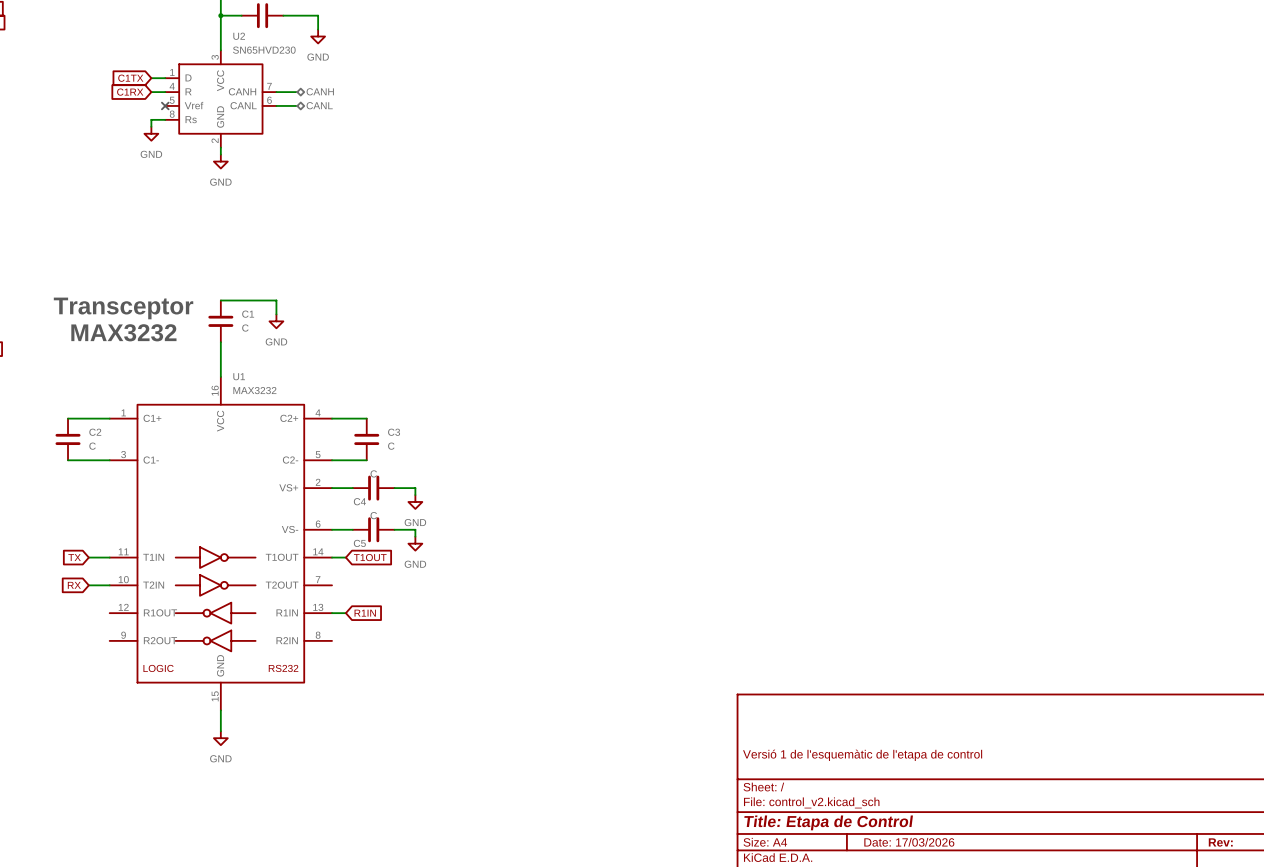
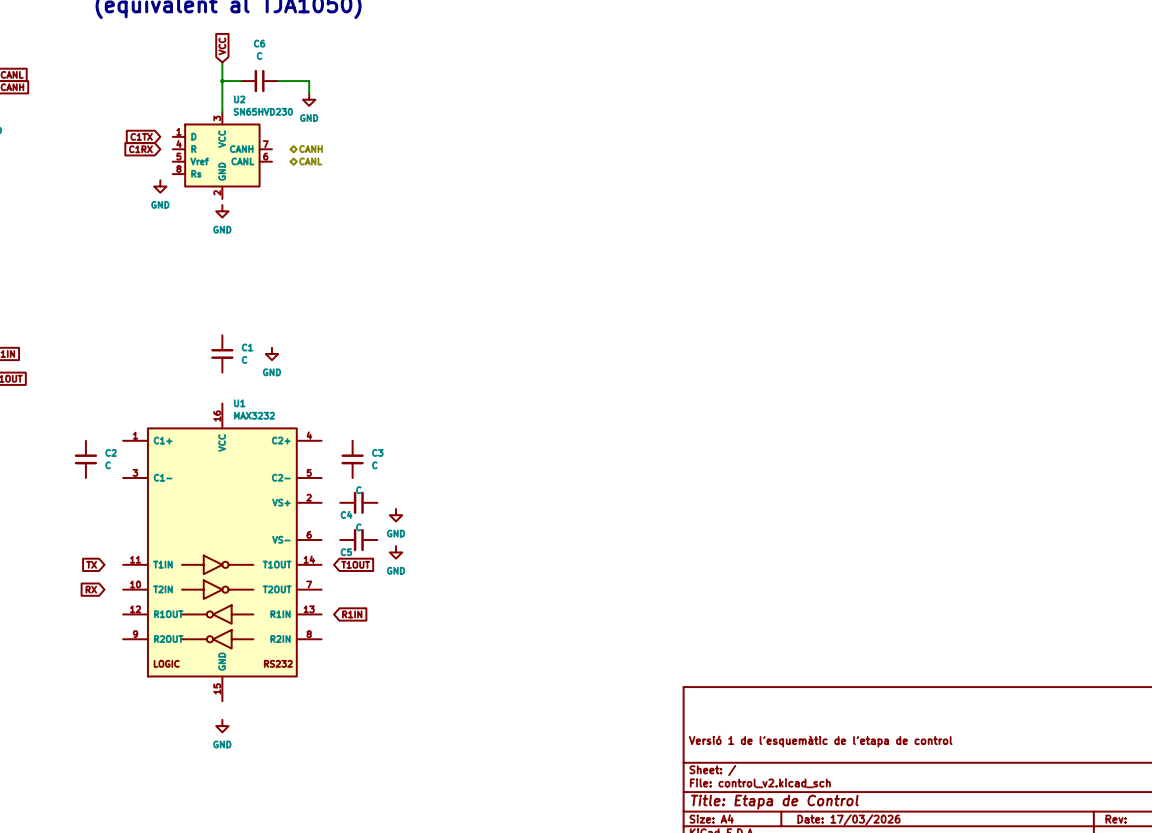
wire: (151, 78) (165, 78) -> none
wire: (151, 92) (165, 92) -> none
wire: (276, 92) (297, 92) -> none
no-connect mark: (165, 105) -> none
wire: (276, 105) (297, 105) -> none
wire: (165, 119) (151, 119) (151, 126) -> none
wire: (220, 147) (220, 154) -> none
wire: (220, 300) (276, 300) (276, 314) -> none
text: Transceptor (123, 308) -> none
text: MAX3232 (123, 332) -> none
wire: (220, 342) (220, 376) -> none
wire: (68, 418) (109, 418) -> none
wire: (332, 418) (366, 418) -> none
wire: (68, 460) (109, 460) -> none
wire: (332, 460) (366, 460) -> none
wire: (332, 488) (352, 488) -> none
wire: (394, 488) (415, 488) (415, 495) -> none
wire: (332, 529) (352, 529) -> none
wire: (394, 529) (415, 529) (415, 536) -> none
wire: (88, 557) (109, 557) -> none
wire: (332, 557) (345, 557) -> none
wire: (88, 585) (109, 585) -> none
wire: (332, 613) (345, 613) -> none
wire: (220, 710) (220, 731) -> none

